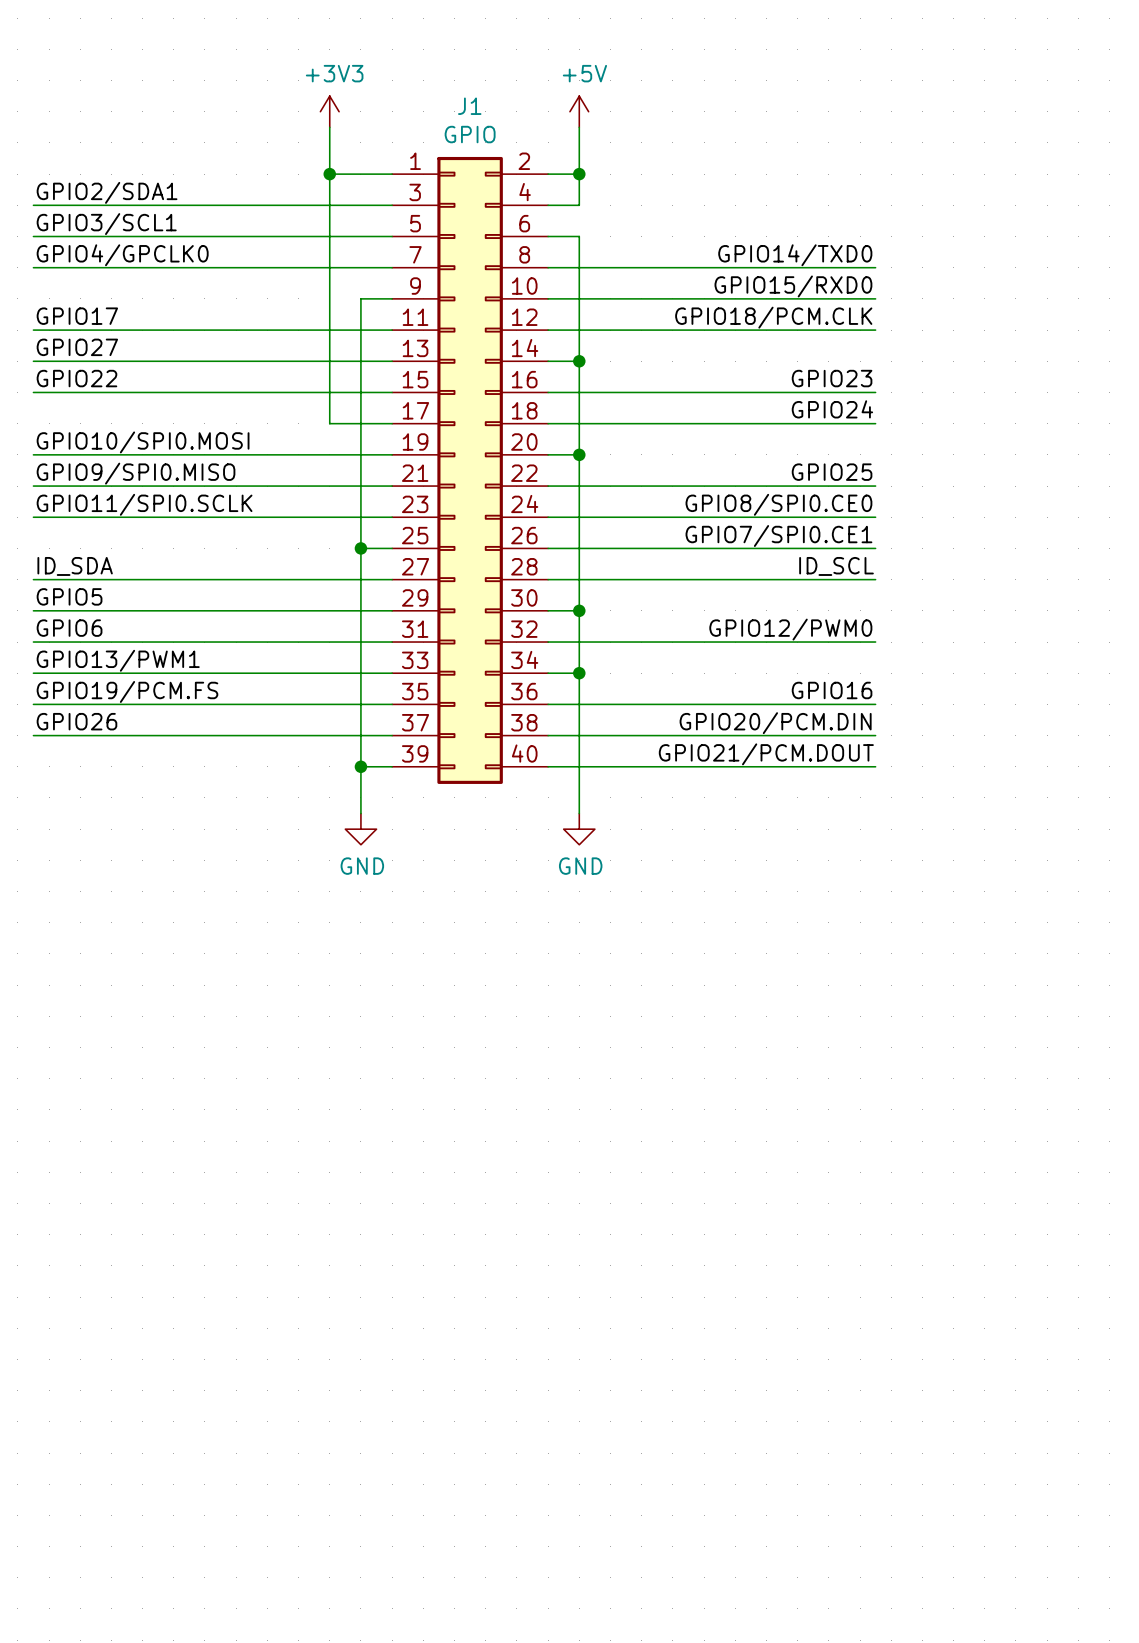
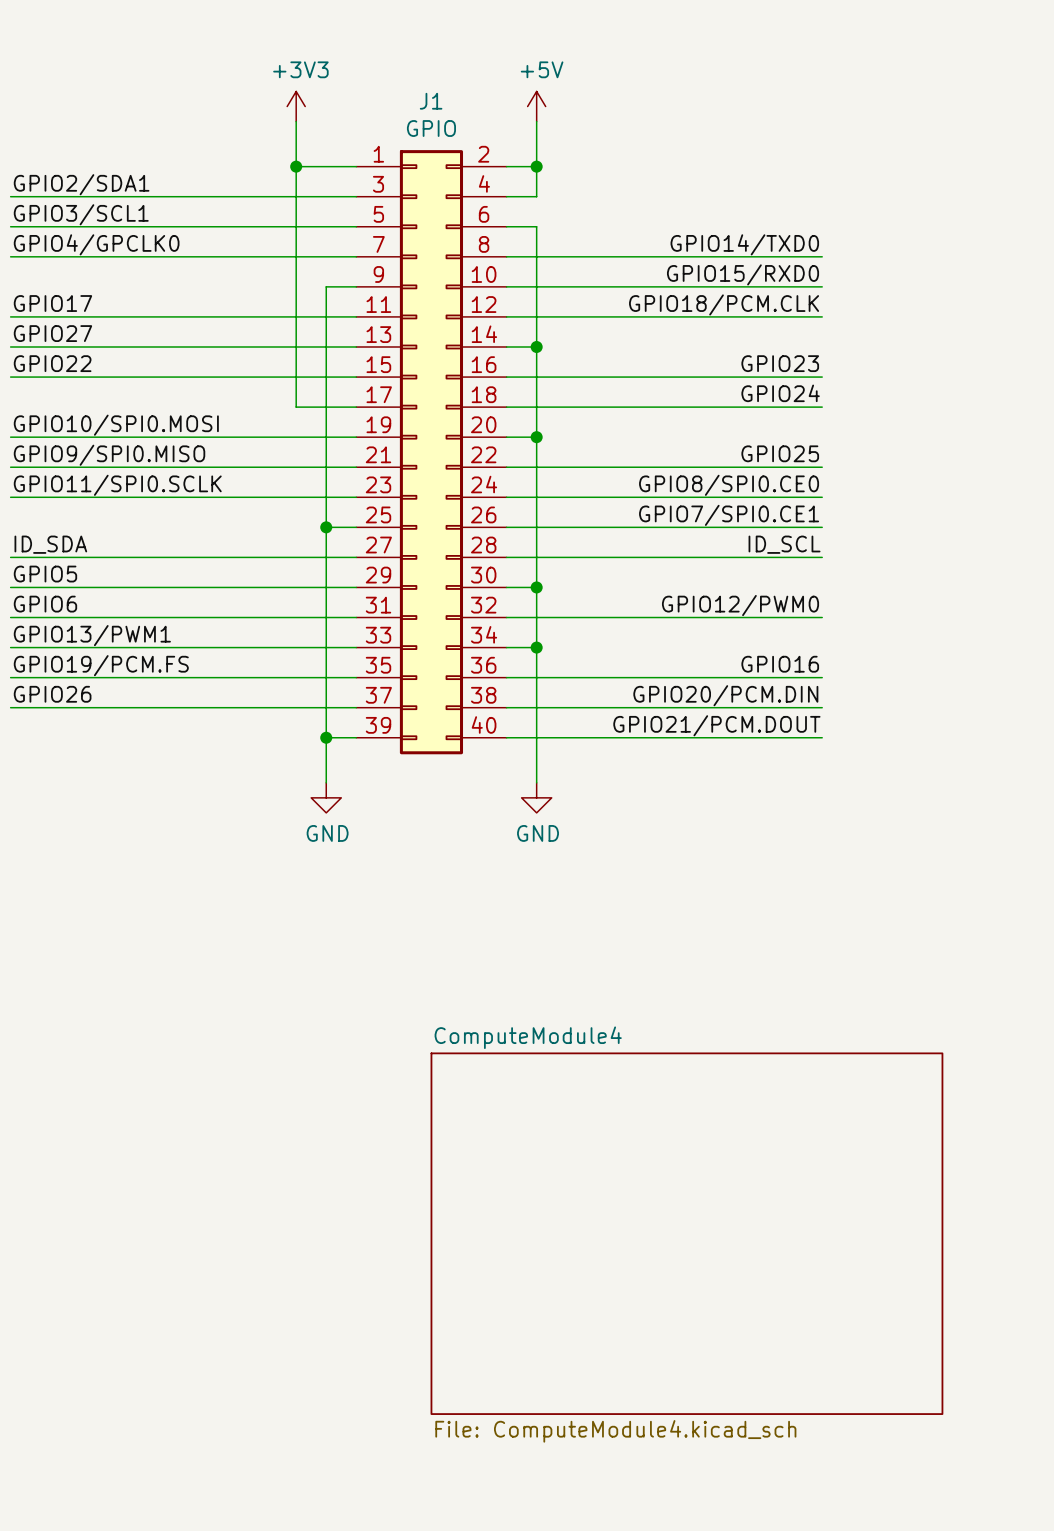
sheet ComputeModule4: none -> File: ComputeModule4.kicad_sch (686, 1233)

